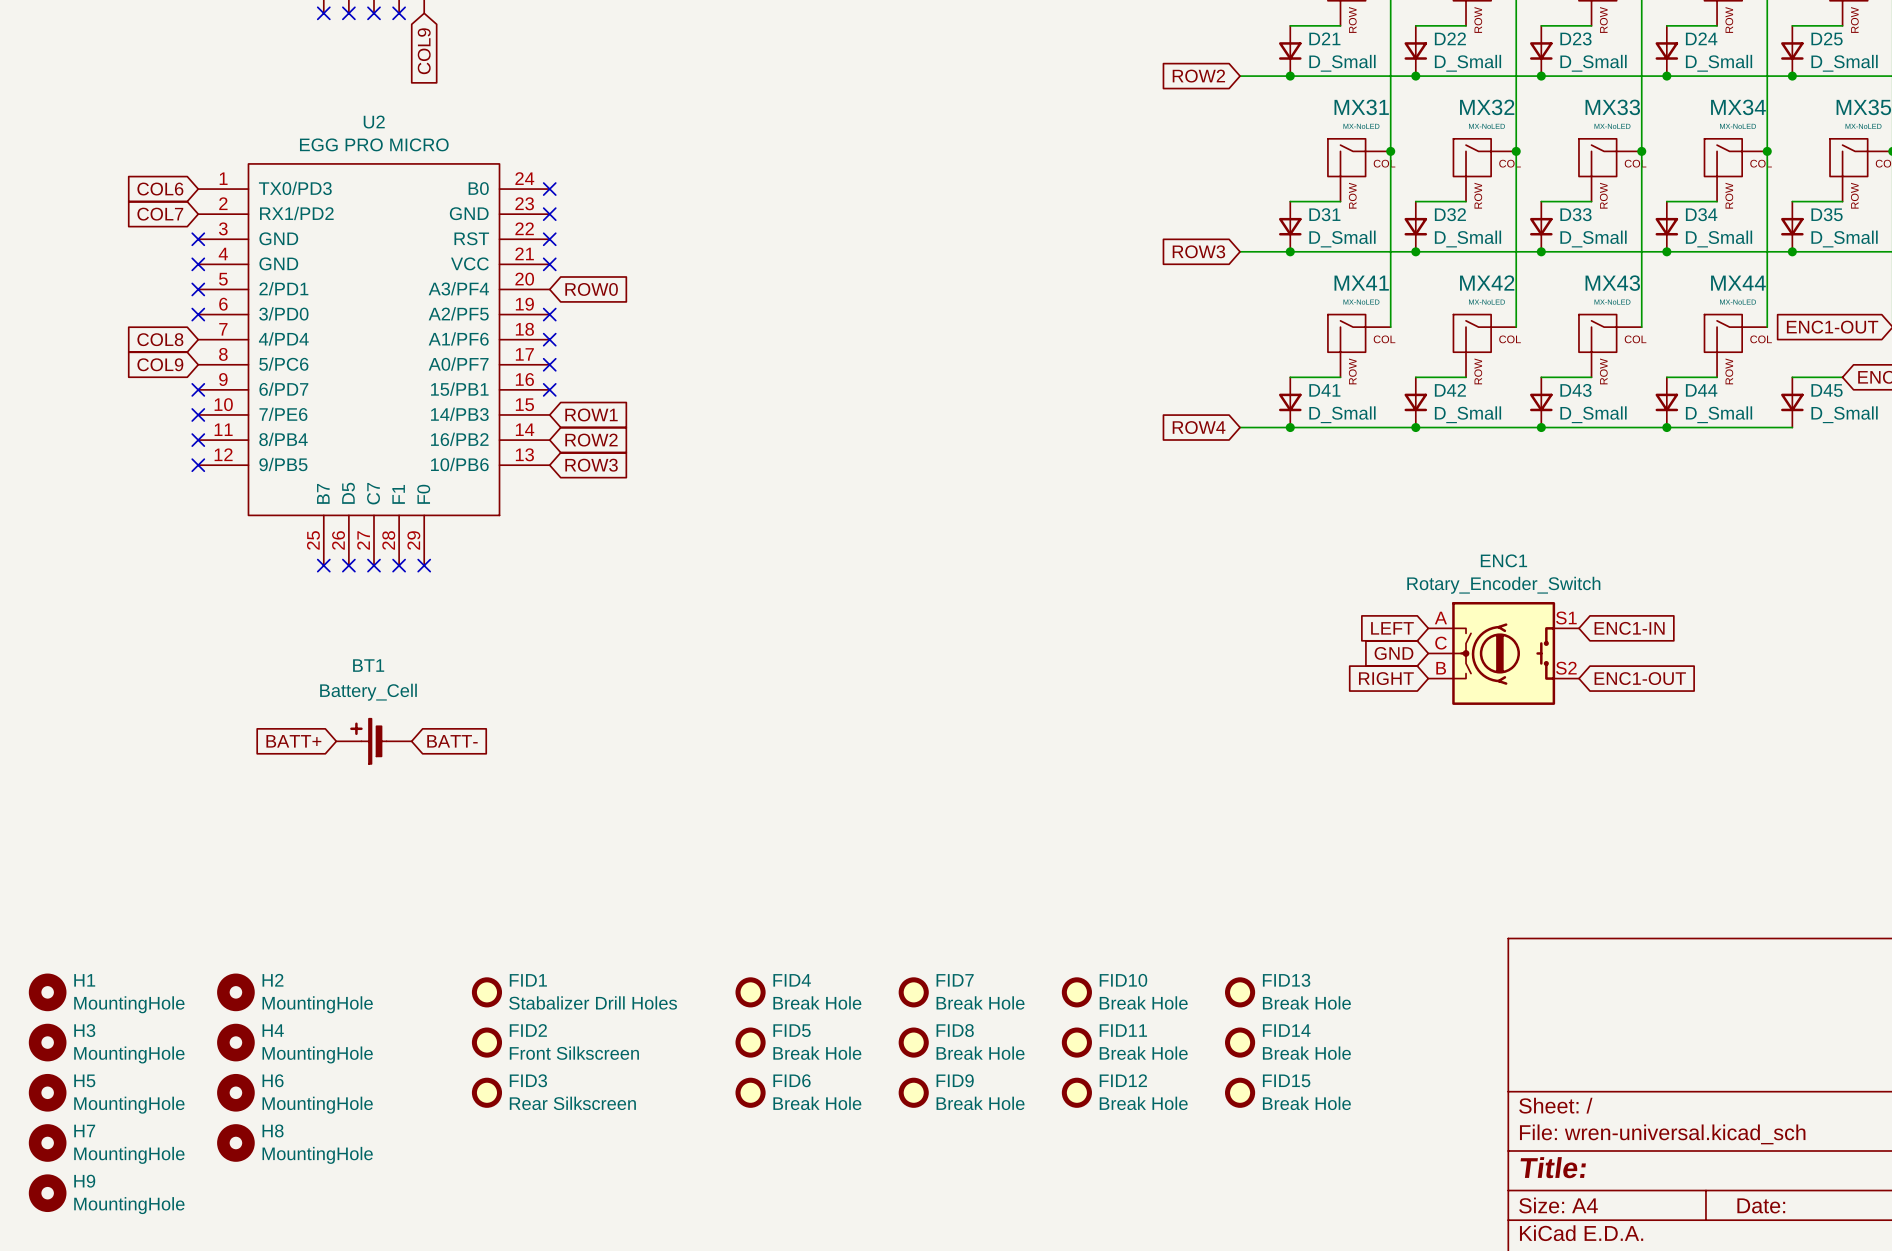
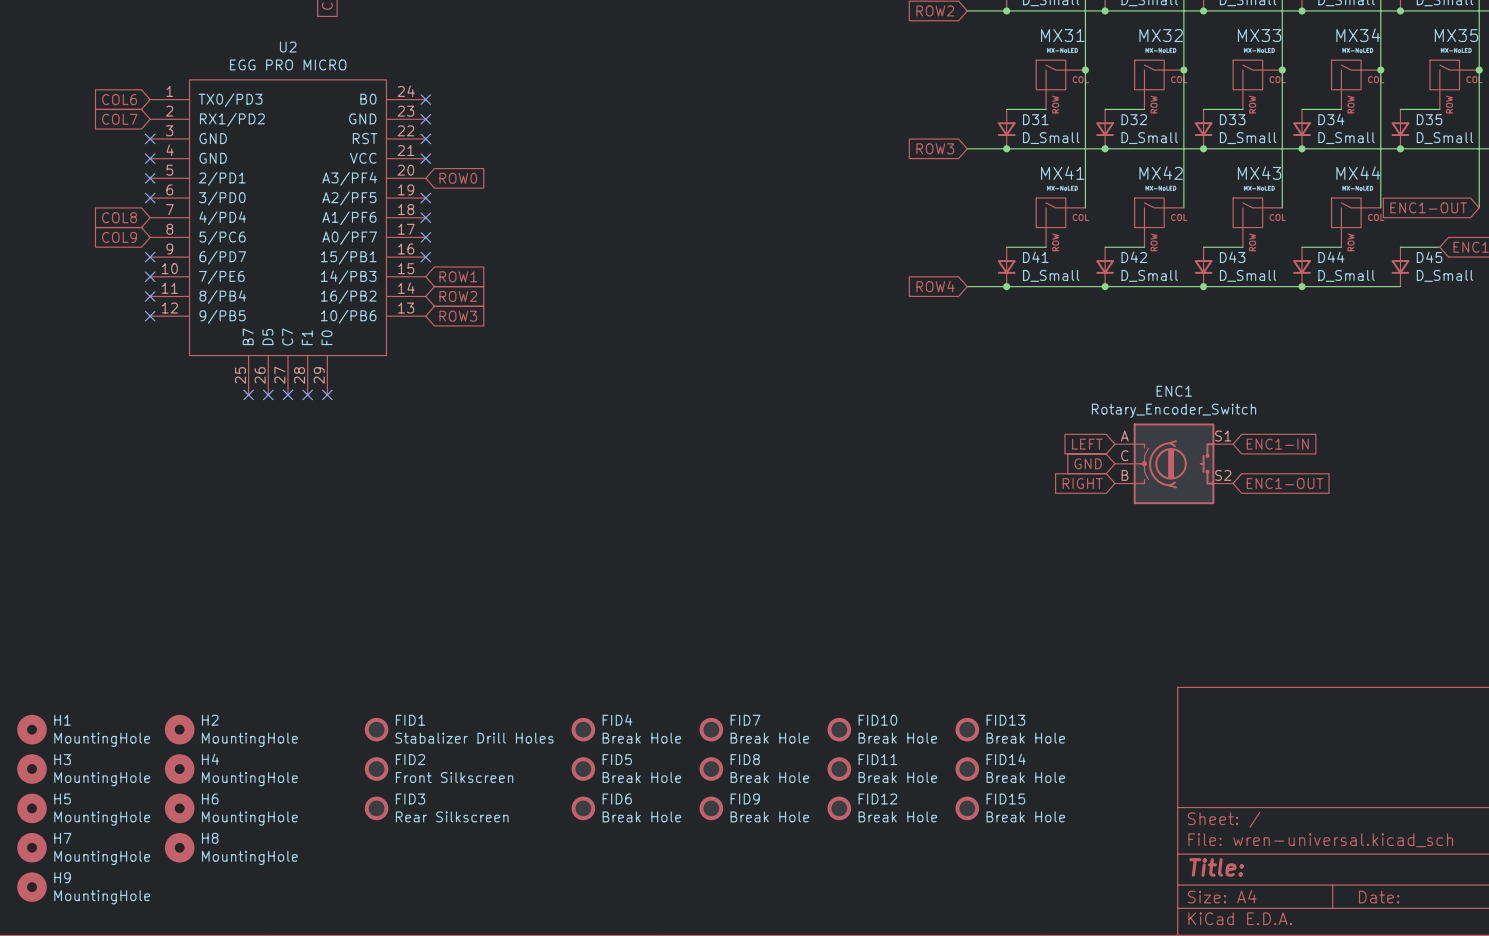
global label: BATT+ (293, 741) -> none
BT1: Battery_Cell (373, 741) -> none
global label: BATT- (452, 741) -> none

